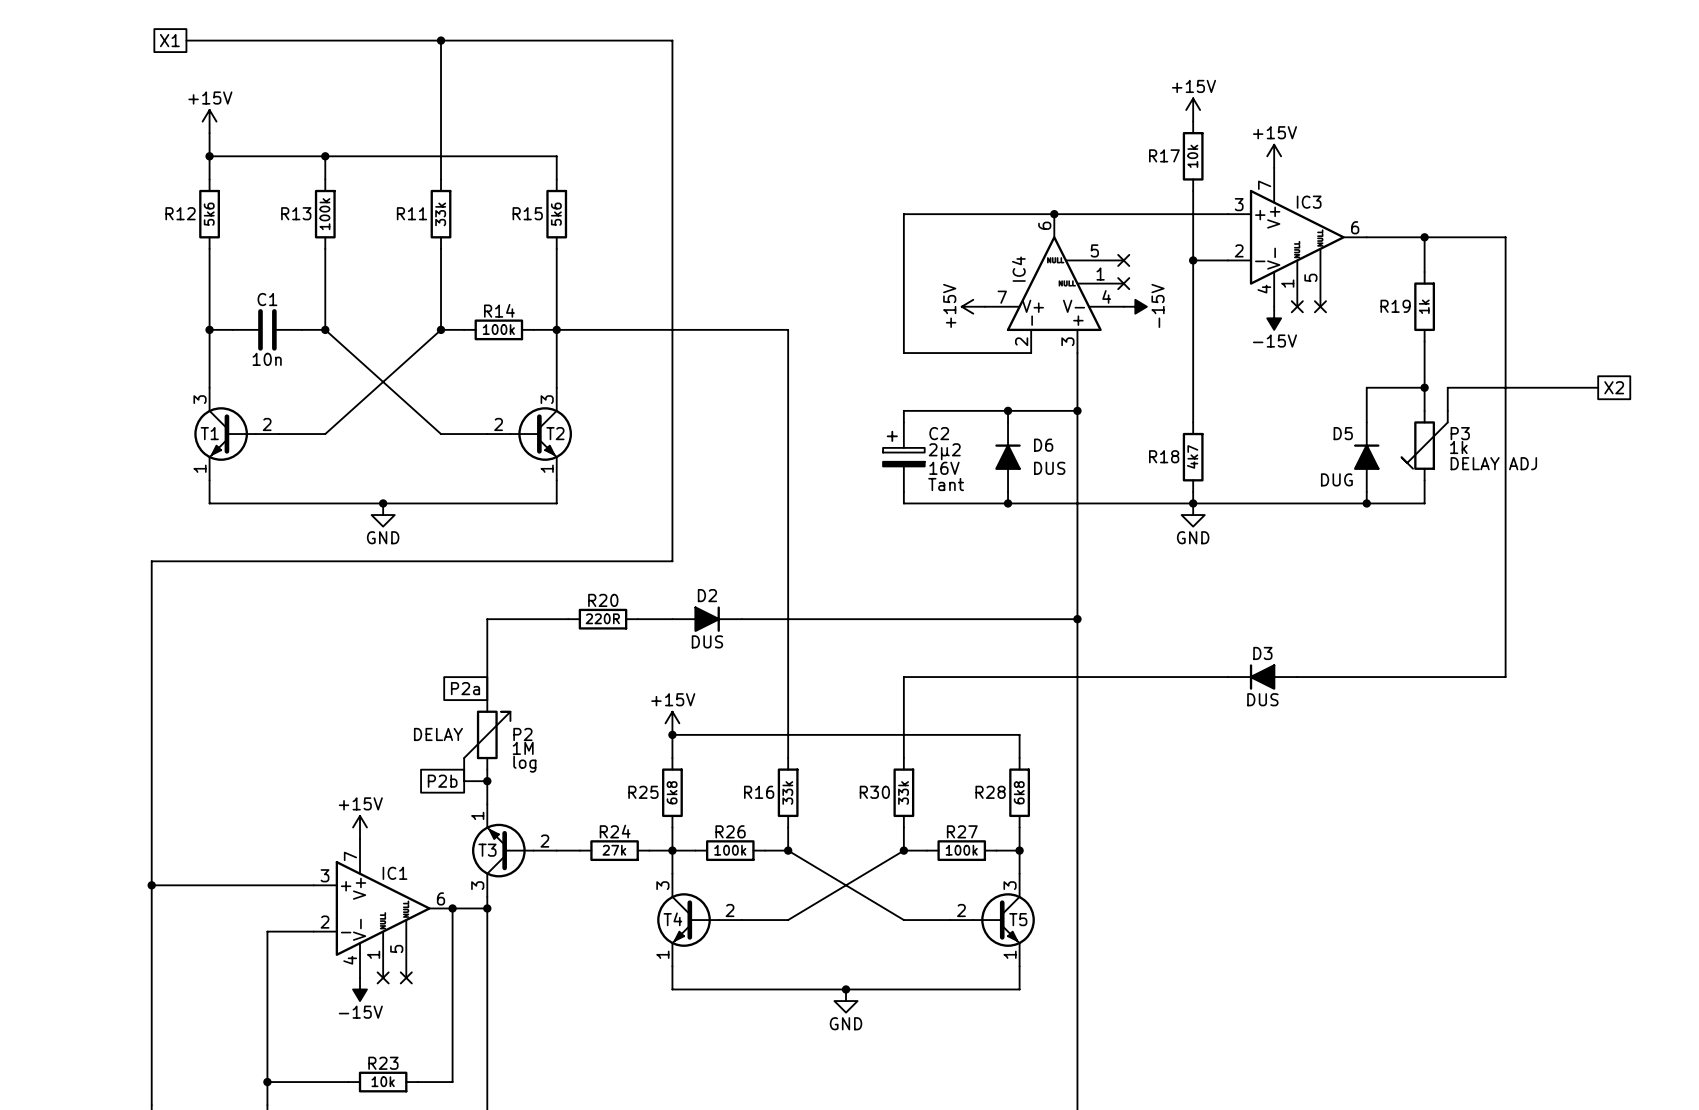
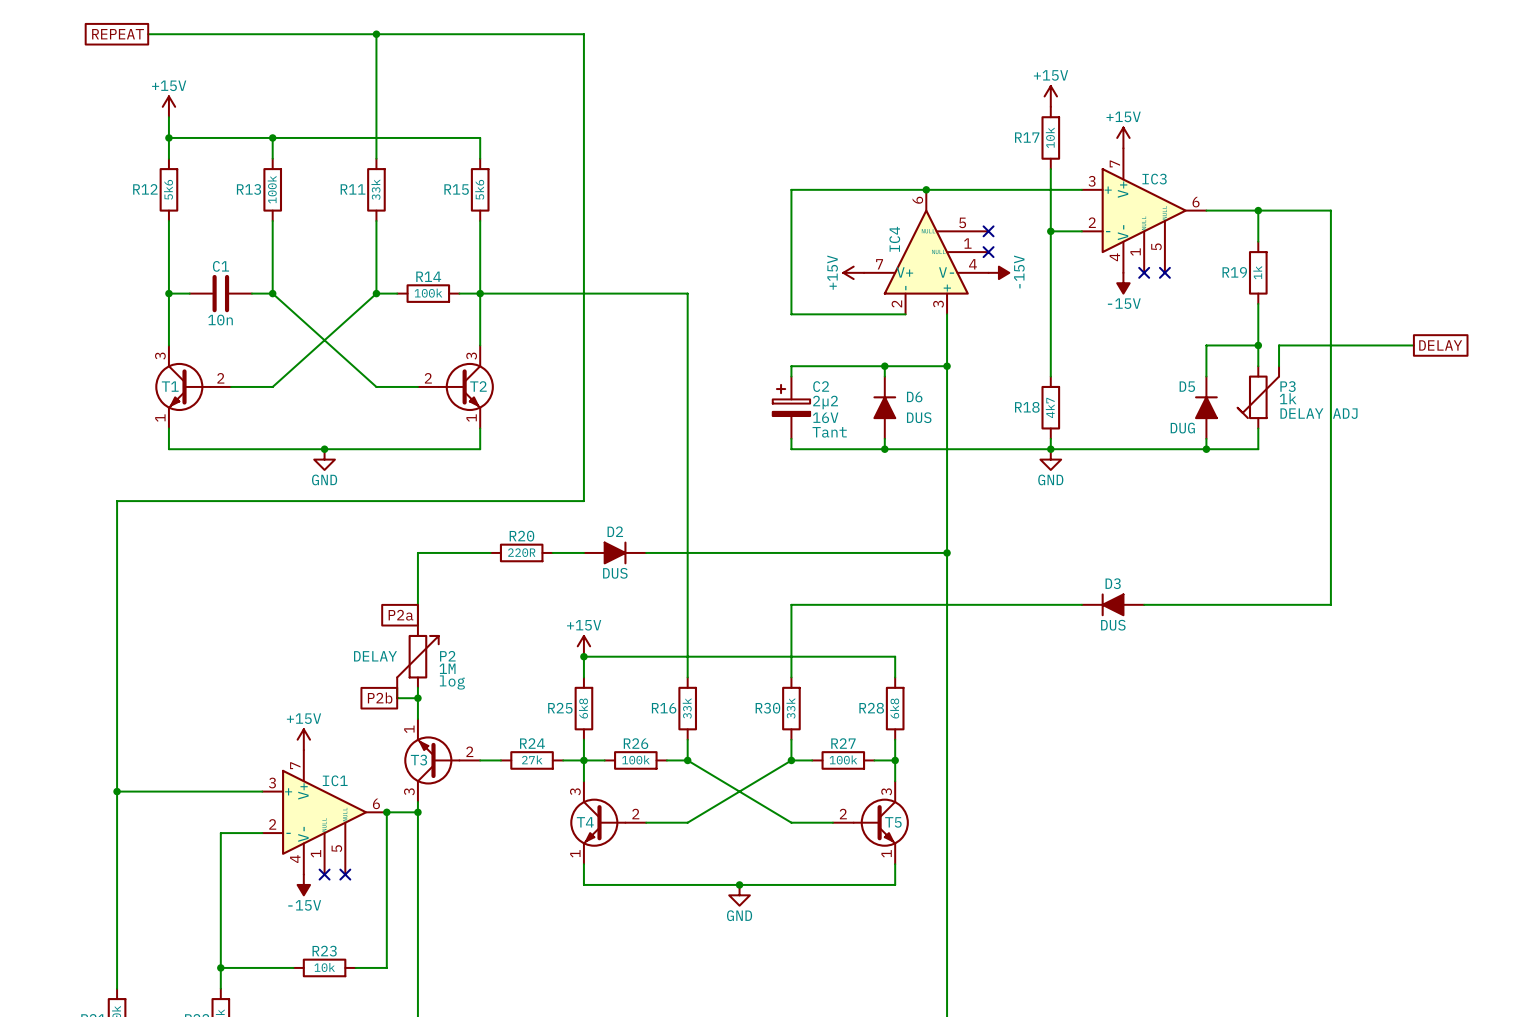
global label: X1 (169, 40) -> REPEAT (118, 34)
global label: X2 (1614, 387) -> DELAY (1440, 345)

